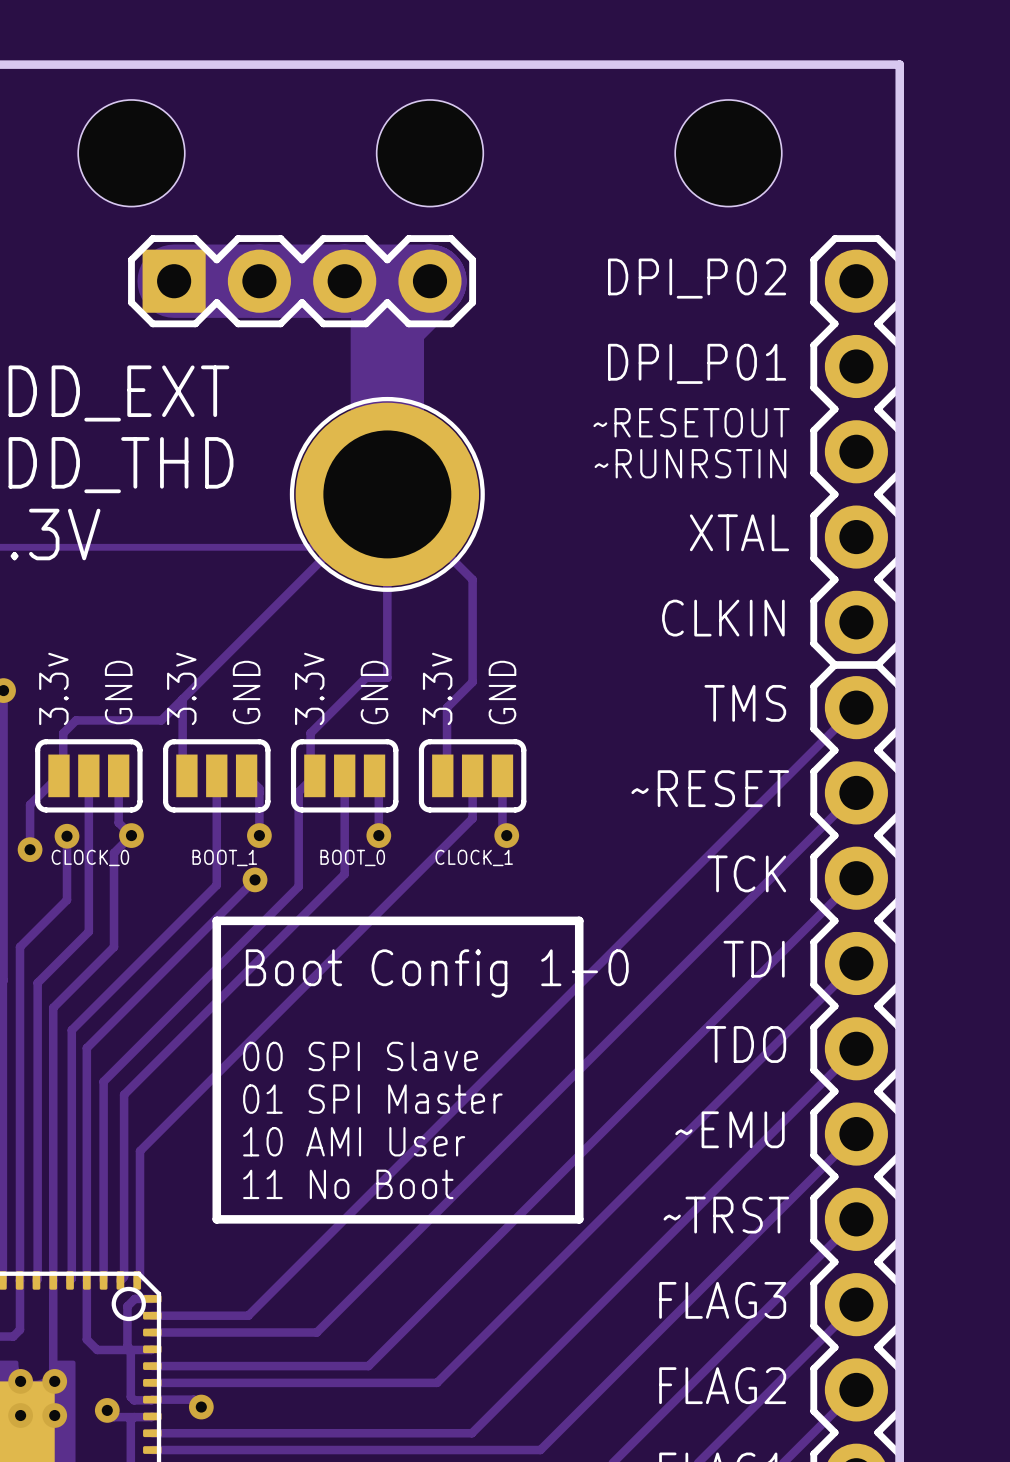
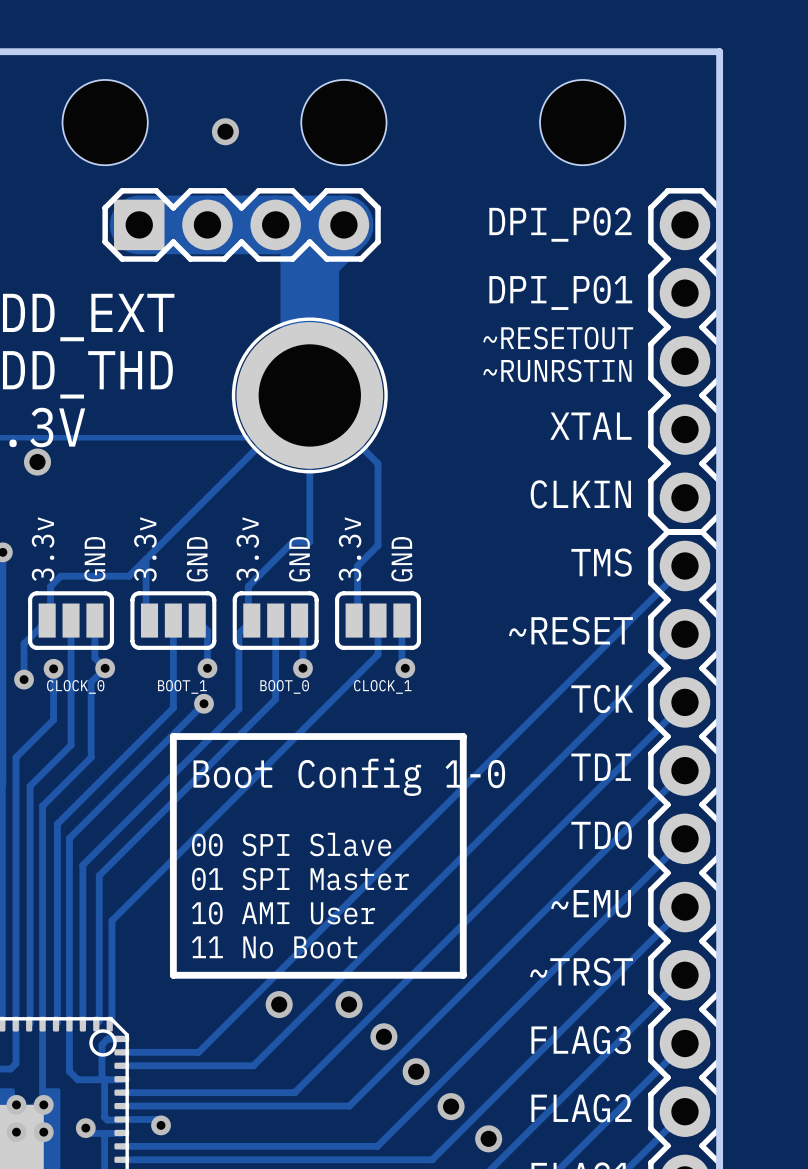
via: none -> (225, 131)
via: none -> (37, 462)
via: none -> (279, 1004)
via: none -> (349, 1004)
via: none -> (383, 1036)
via: none -> (416, 1071)
via: none -> (451, 1106)
via: none -> (488, 1138)

